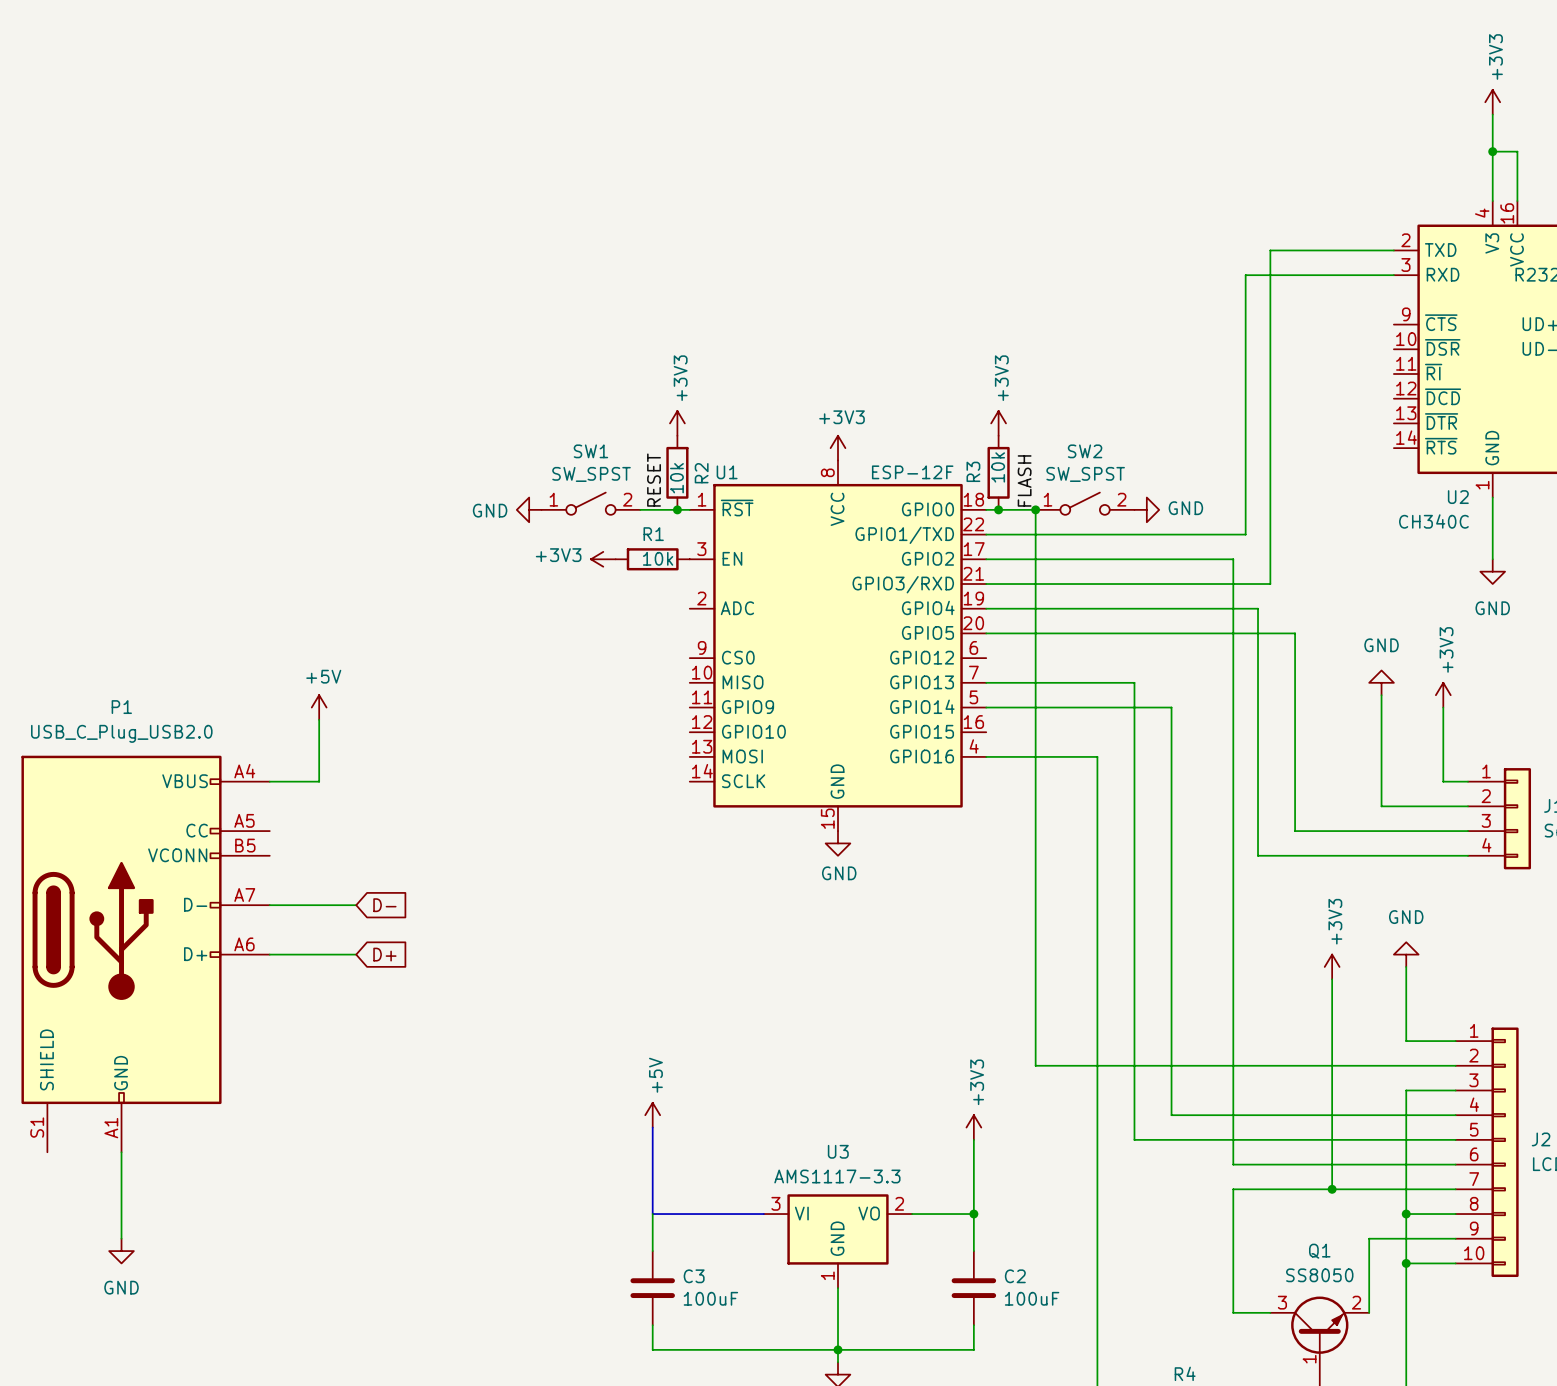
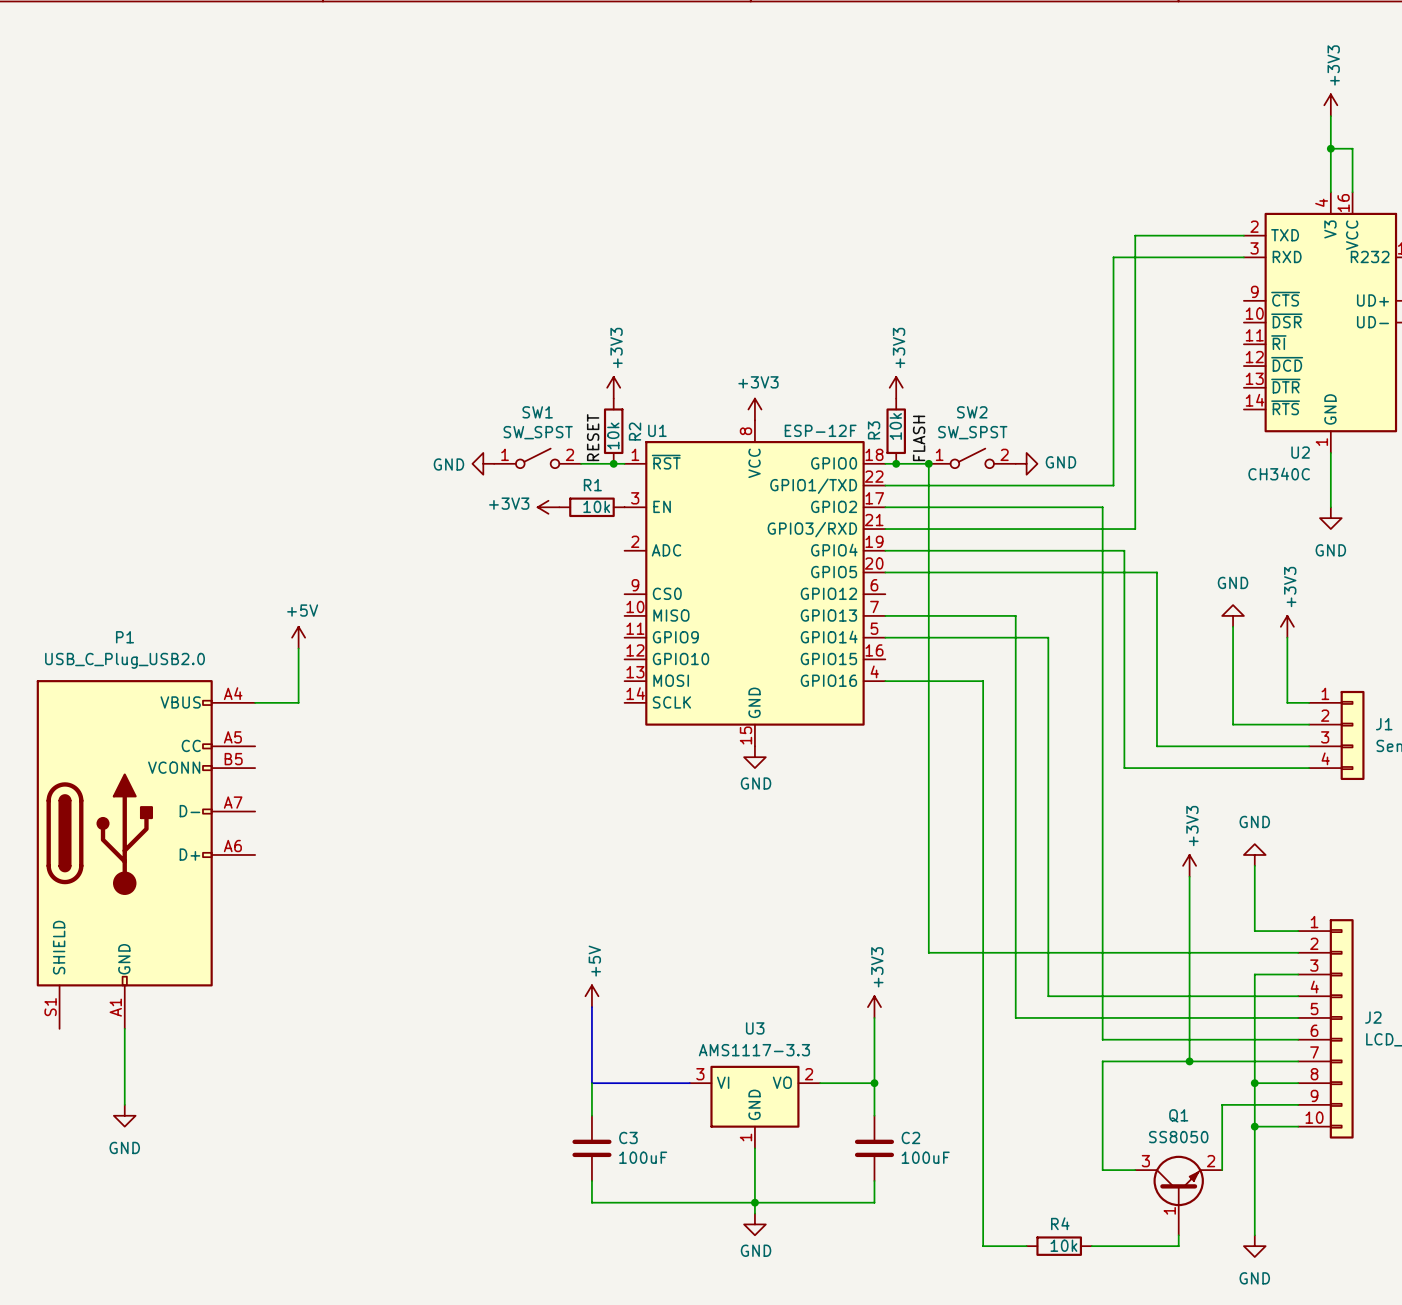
wire: (269, 905) (356, 905) -> none
global label: D- (384, 905) -> none
wire: (269, 954) (356, 954) -> none
global label: D+ (384, 954) -> none

